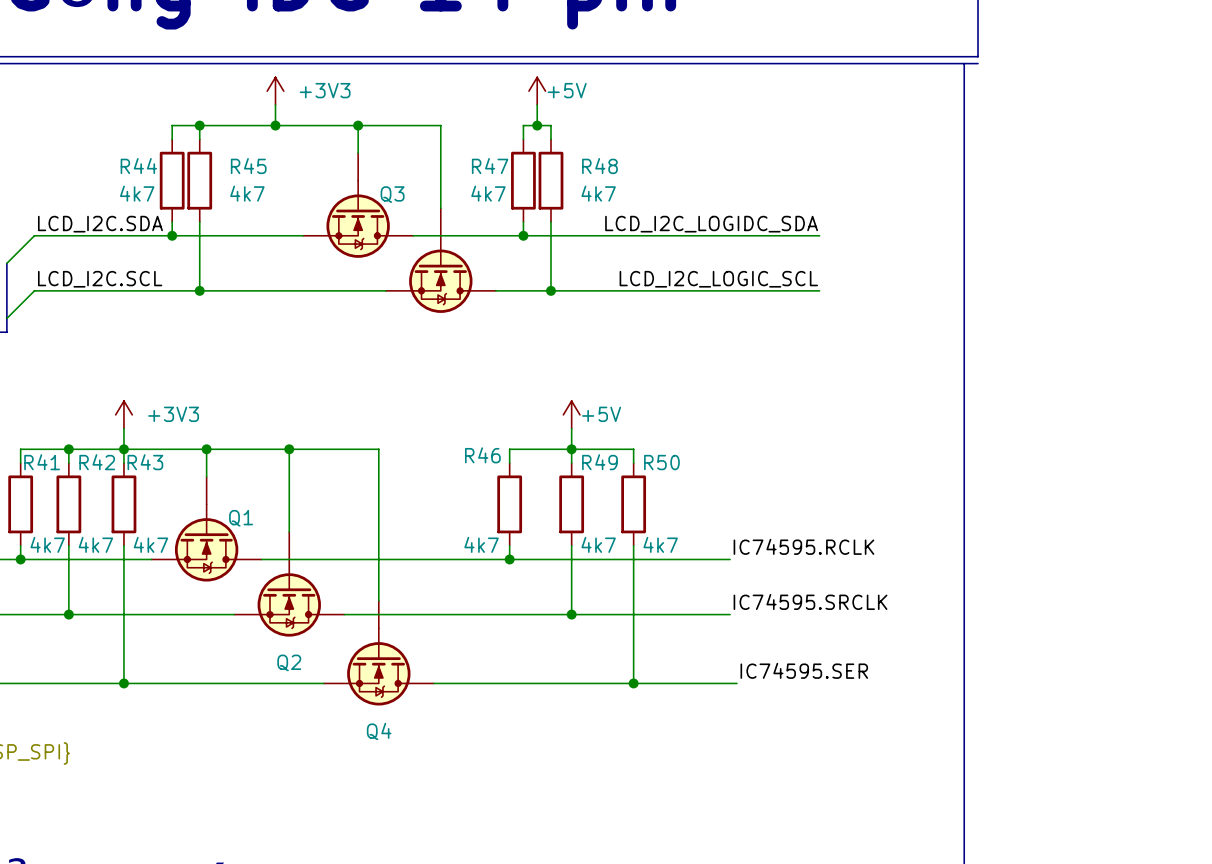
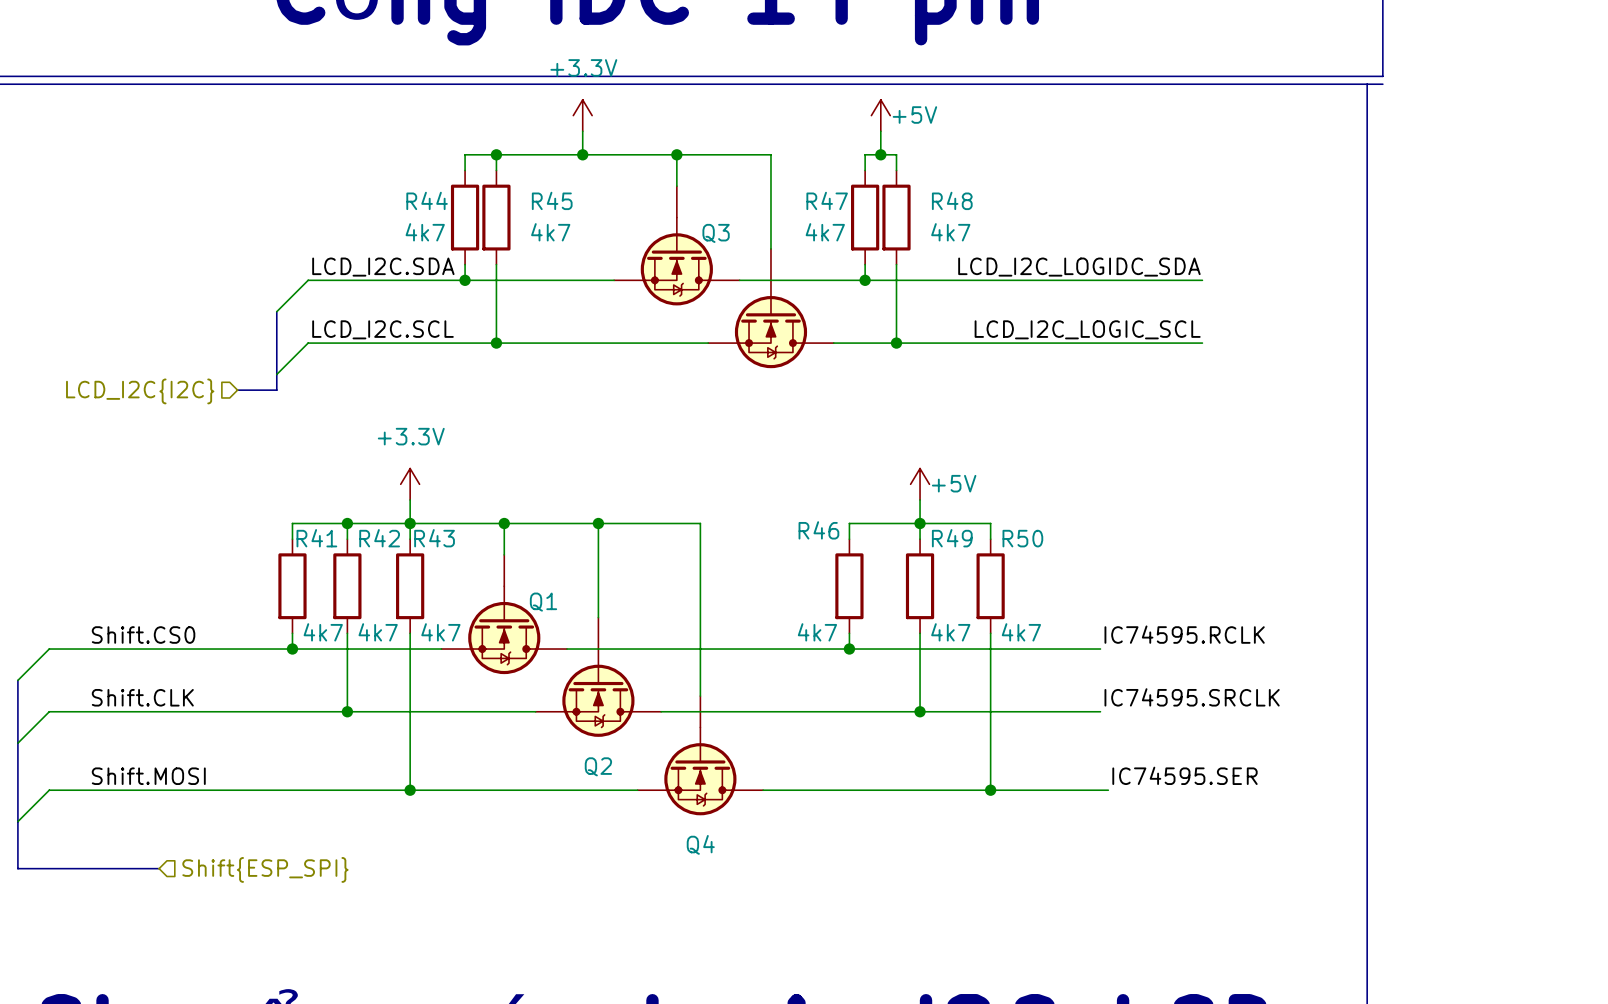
power symbol: +3V3 (275, 91) -> +3.3V (582, 115)
power symbol: +3V3 (123, 414) -> +3.3V (410, 484)

